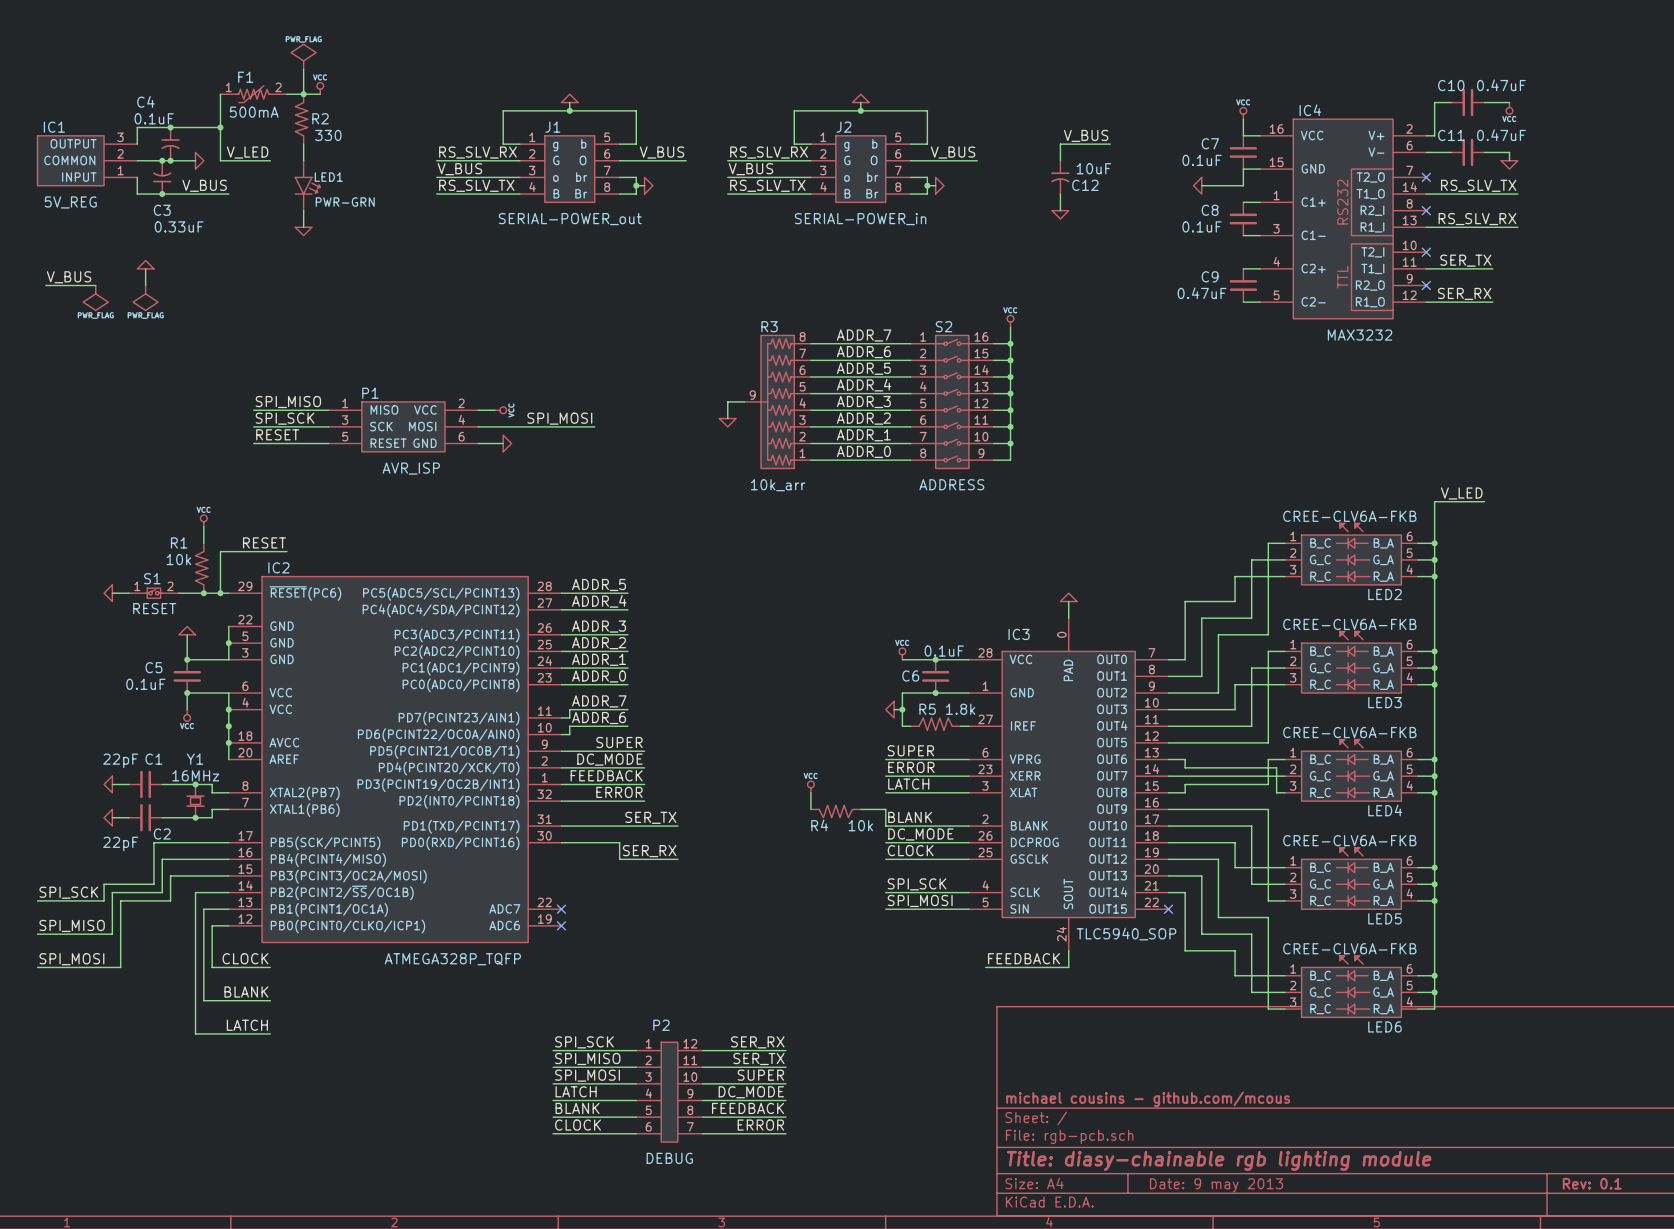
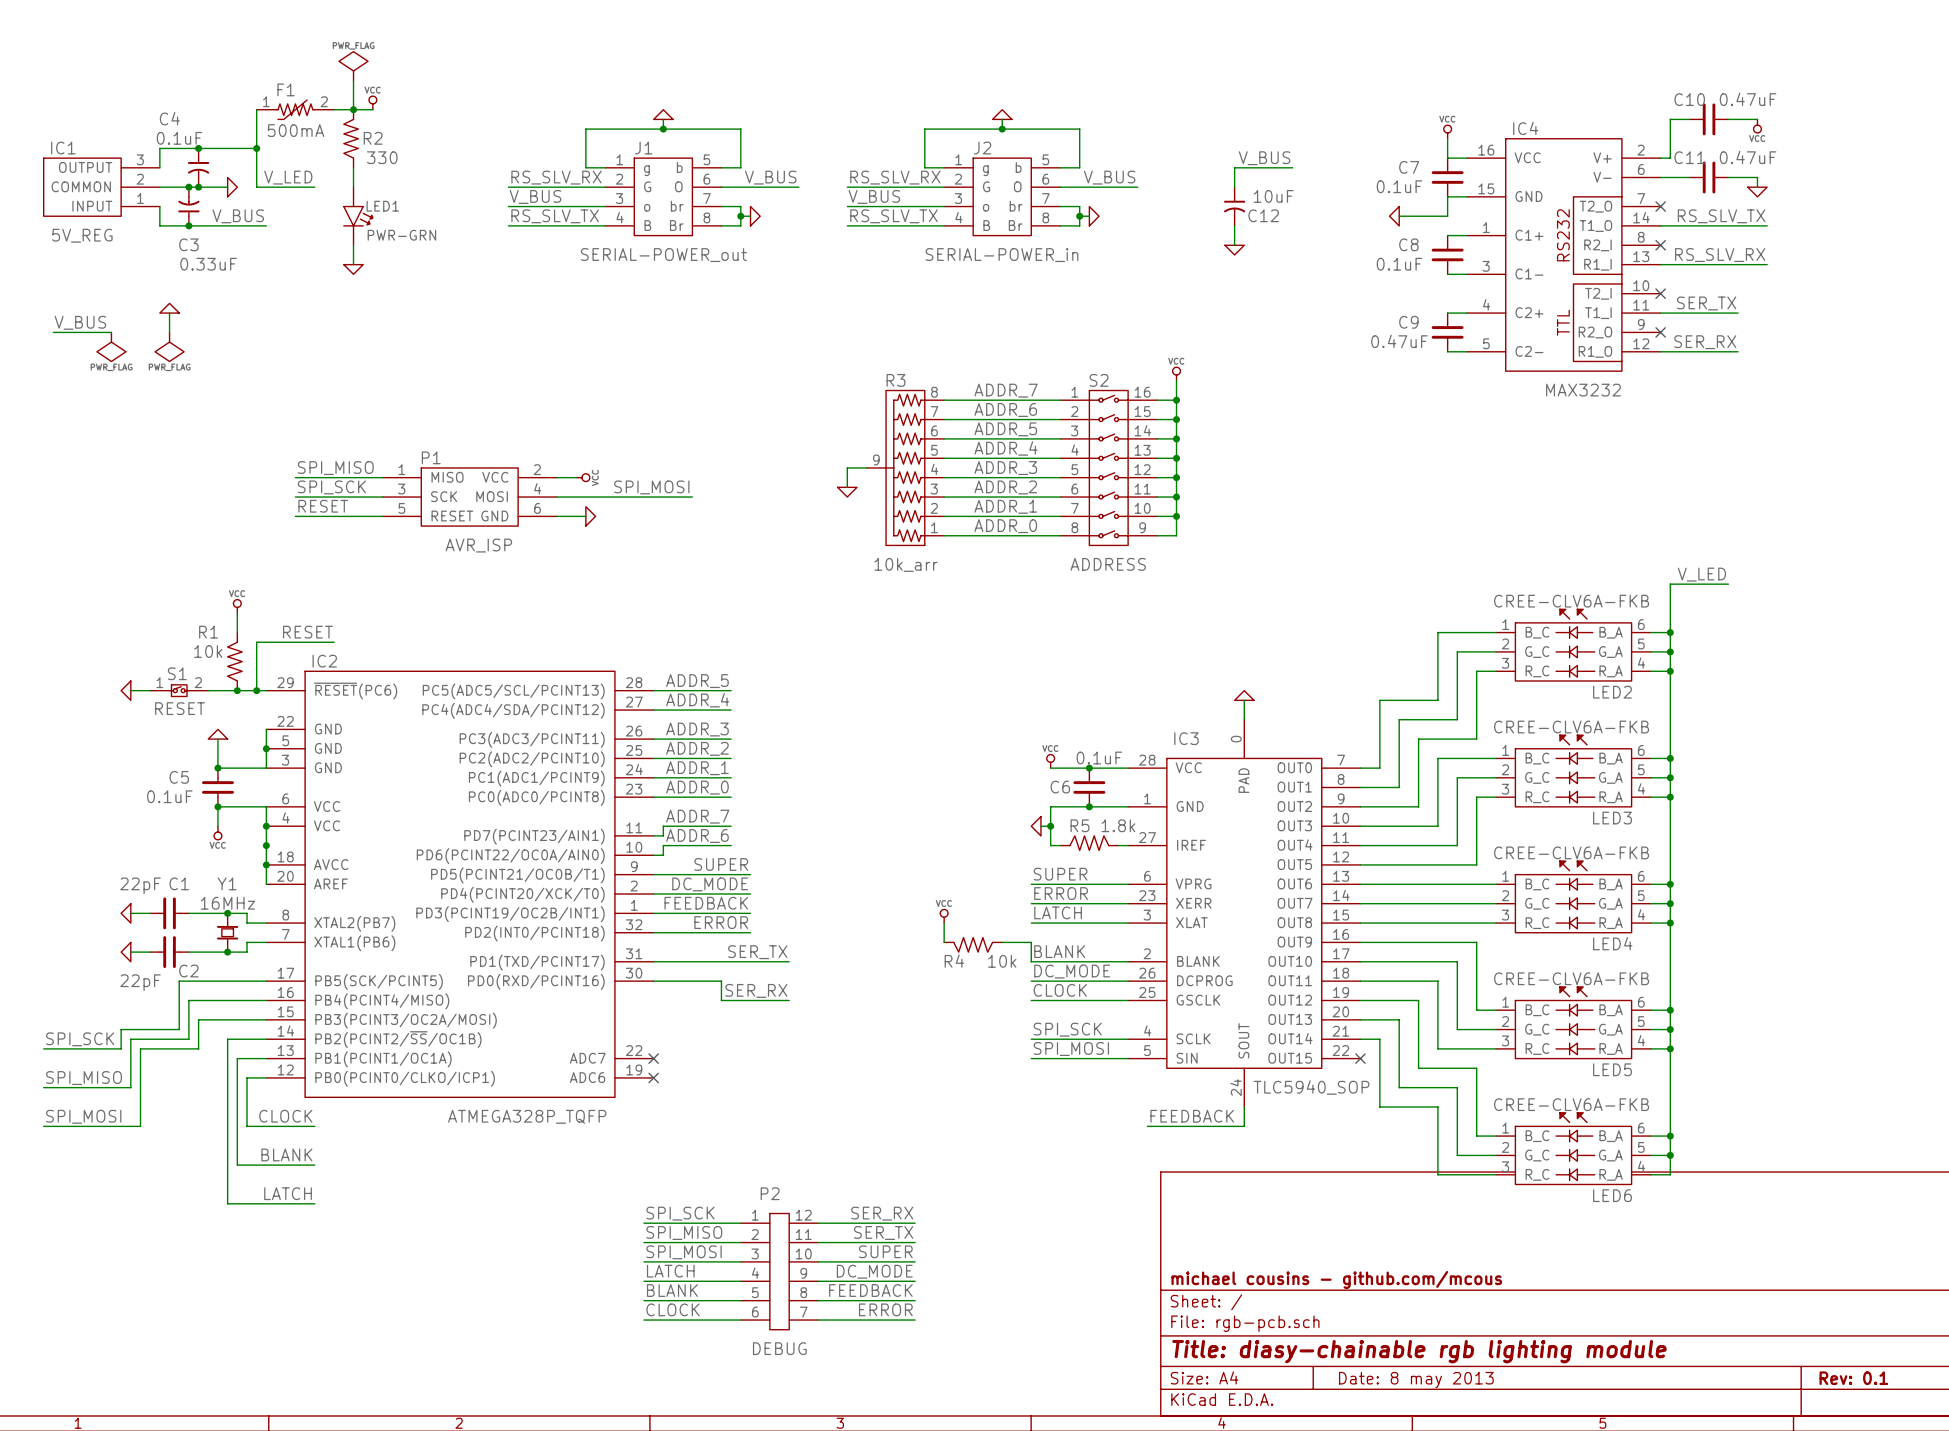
wire: (1268, 543) (1268, 576) (1235, 576) -> (1476, 632) (1437, 632) (1437, 671)
wire: (1268, 651) (1268, 684) (1235, 684) -> (1476, 758) (1437, 758) (1437, 797)
wire: (1185, 759) (1185, 767) (1276, 767) (1276, 792) -> (1379, 923) (1486, 923)
wire: (1268, 759) (1268, 784) (1185, 784) (1185, 792) -> (1476, 884) (1379, 884)
wire: (1235, 867) (1268, 867) (1268, 900) -> (1437, 1010) (1437, 1048) (1476, 1048)
wire: (1235, 975) (1268, 975) (1268, 1009) -> (1437, 1136) (1437, 1174) (1476, 1174)
title block: Date: 9 may 2013 (1216, 1185) -> Date: 8 may 2013 (1416, 1380)

